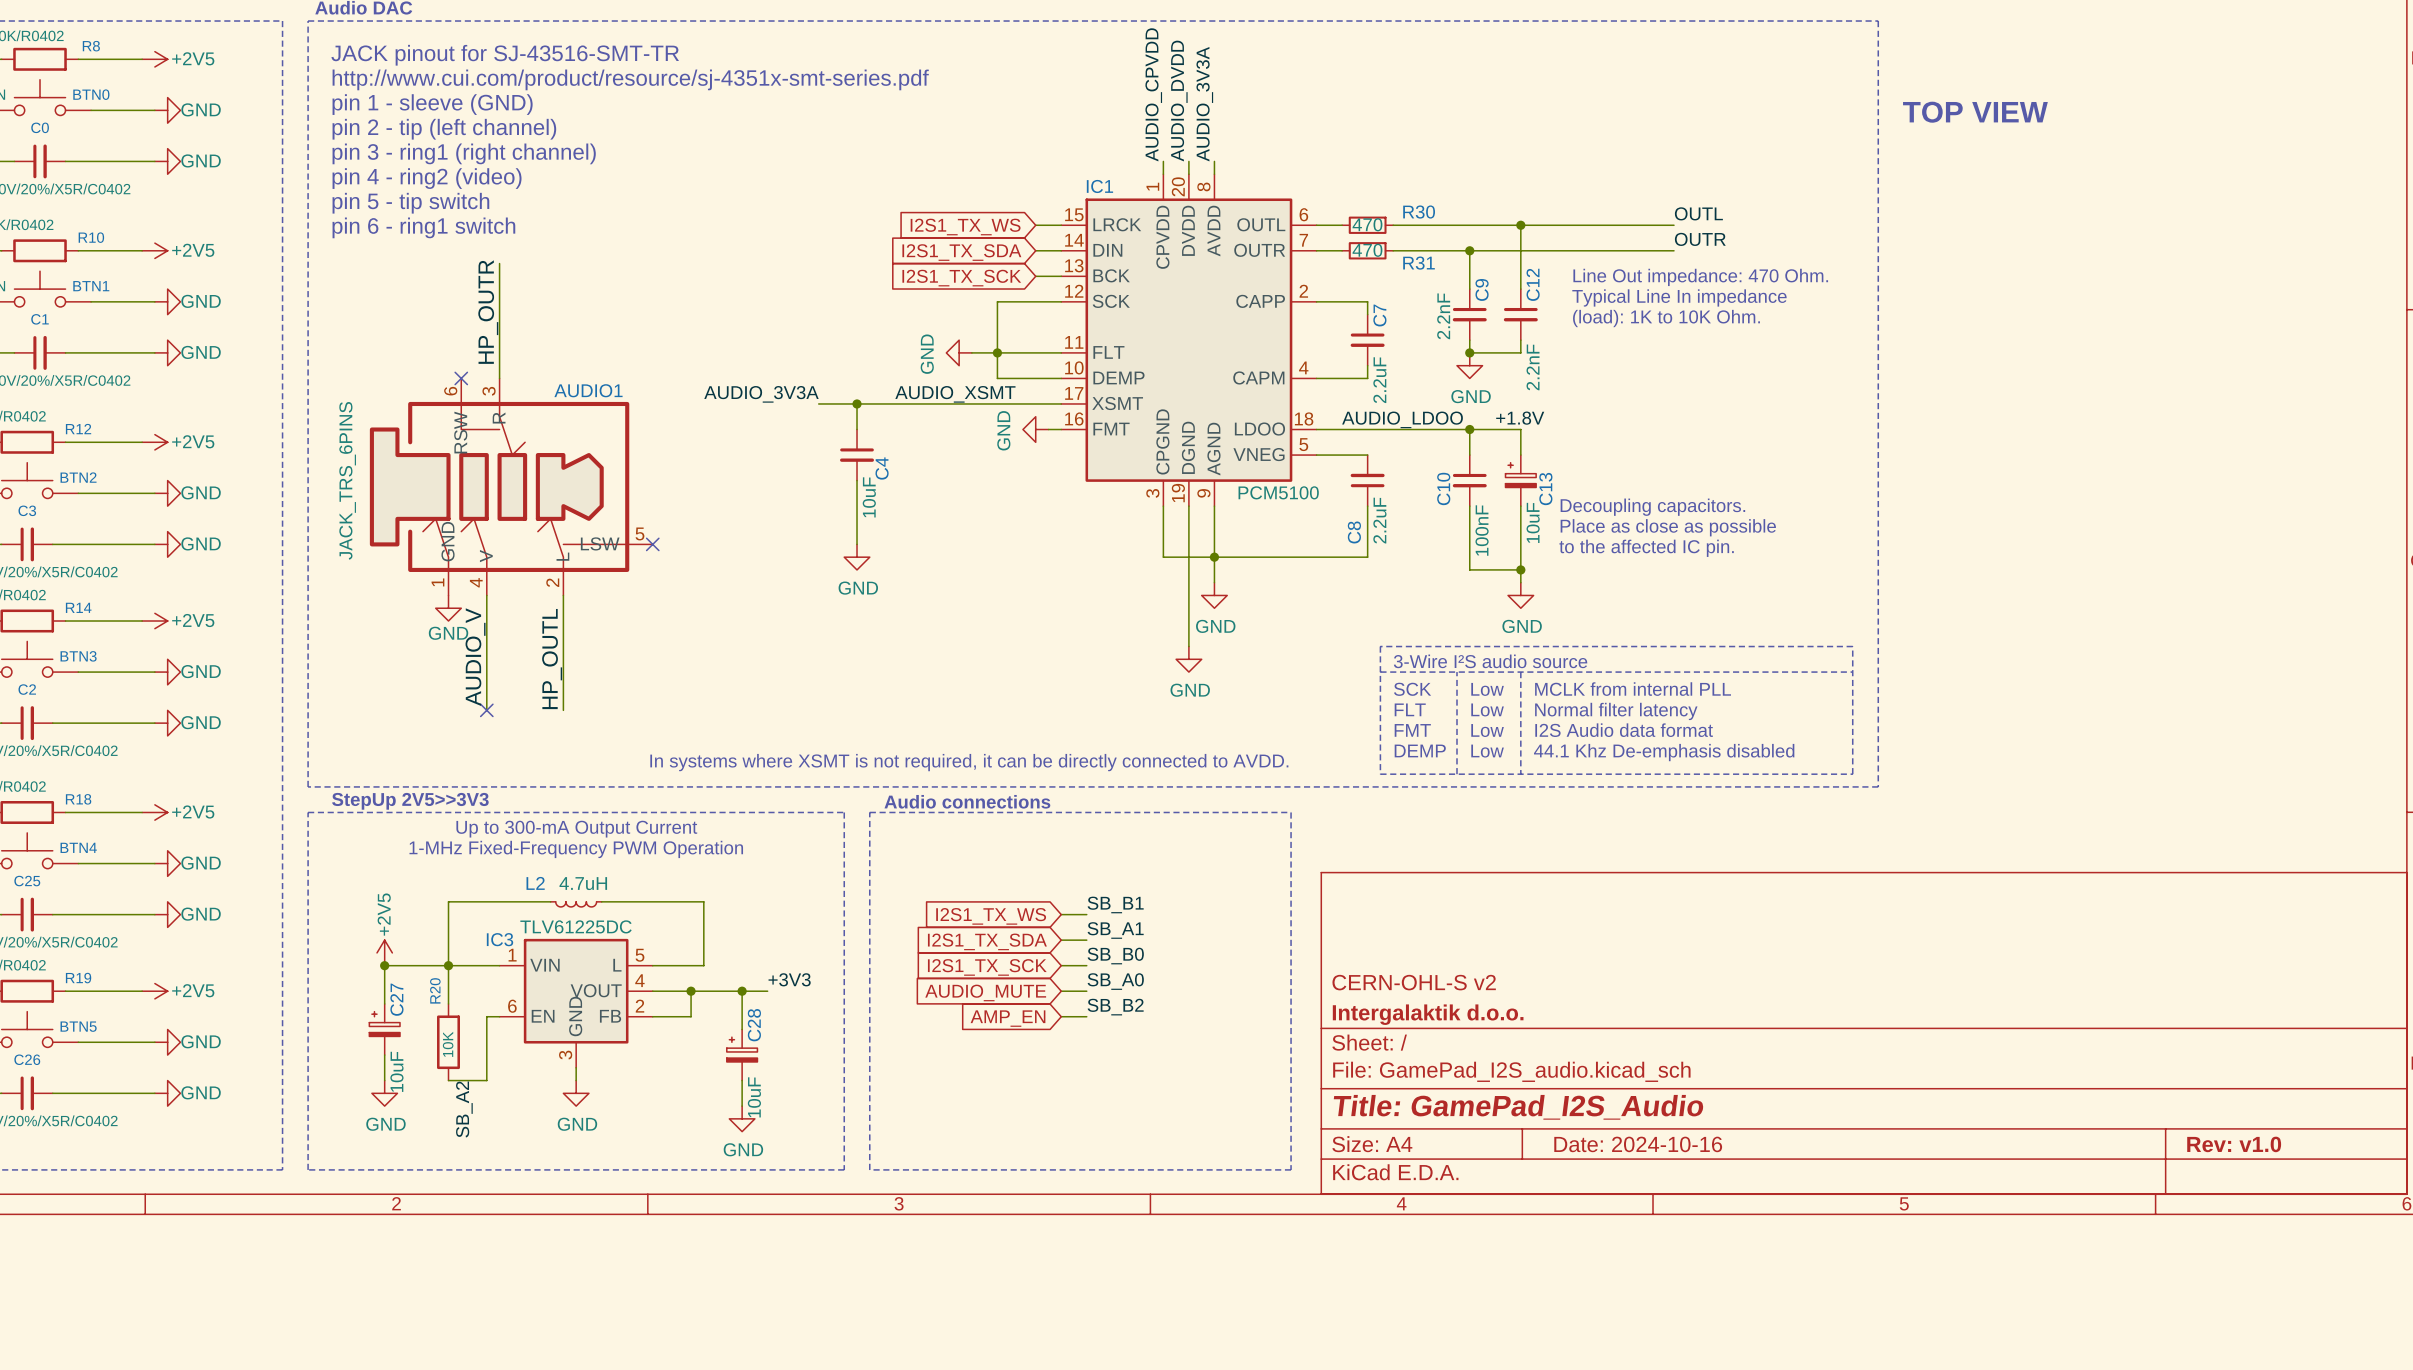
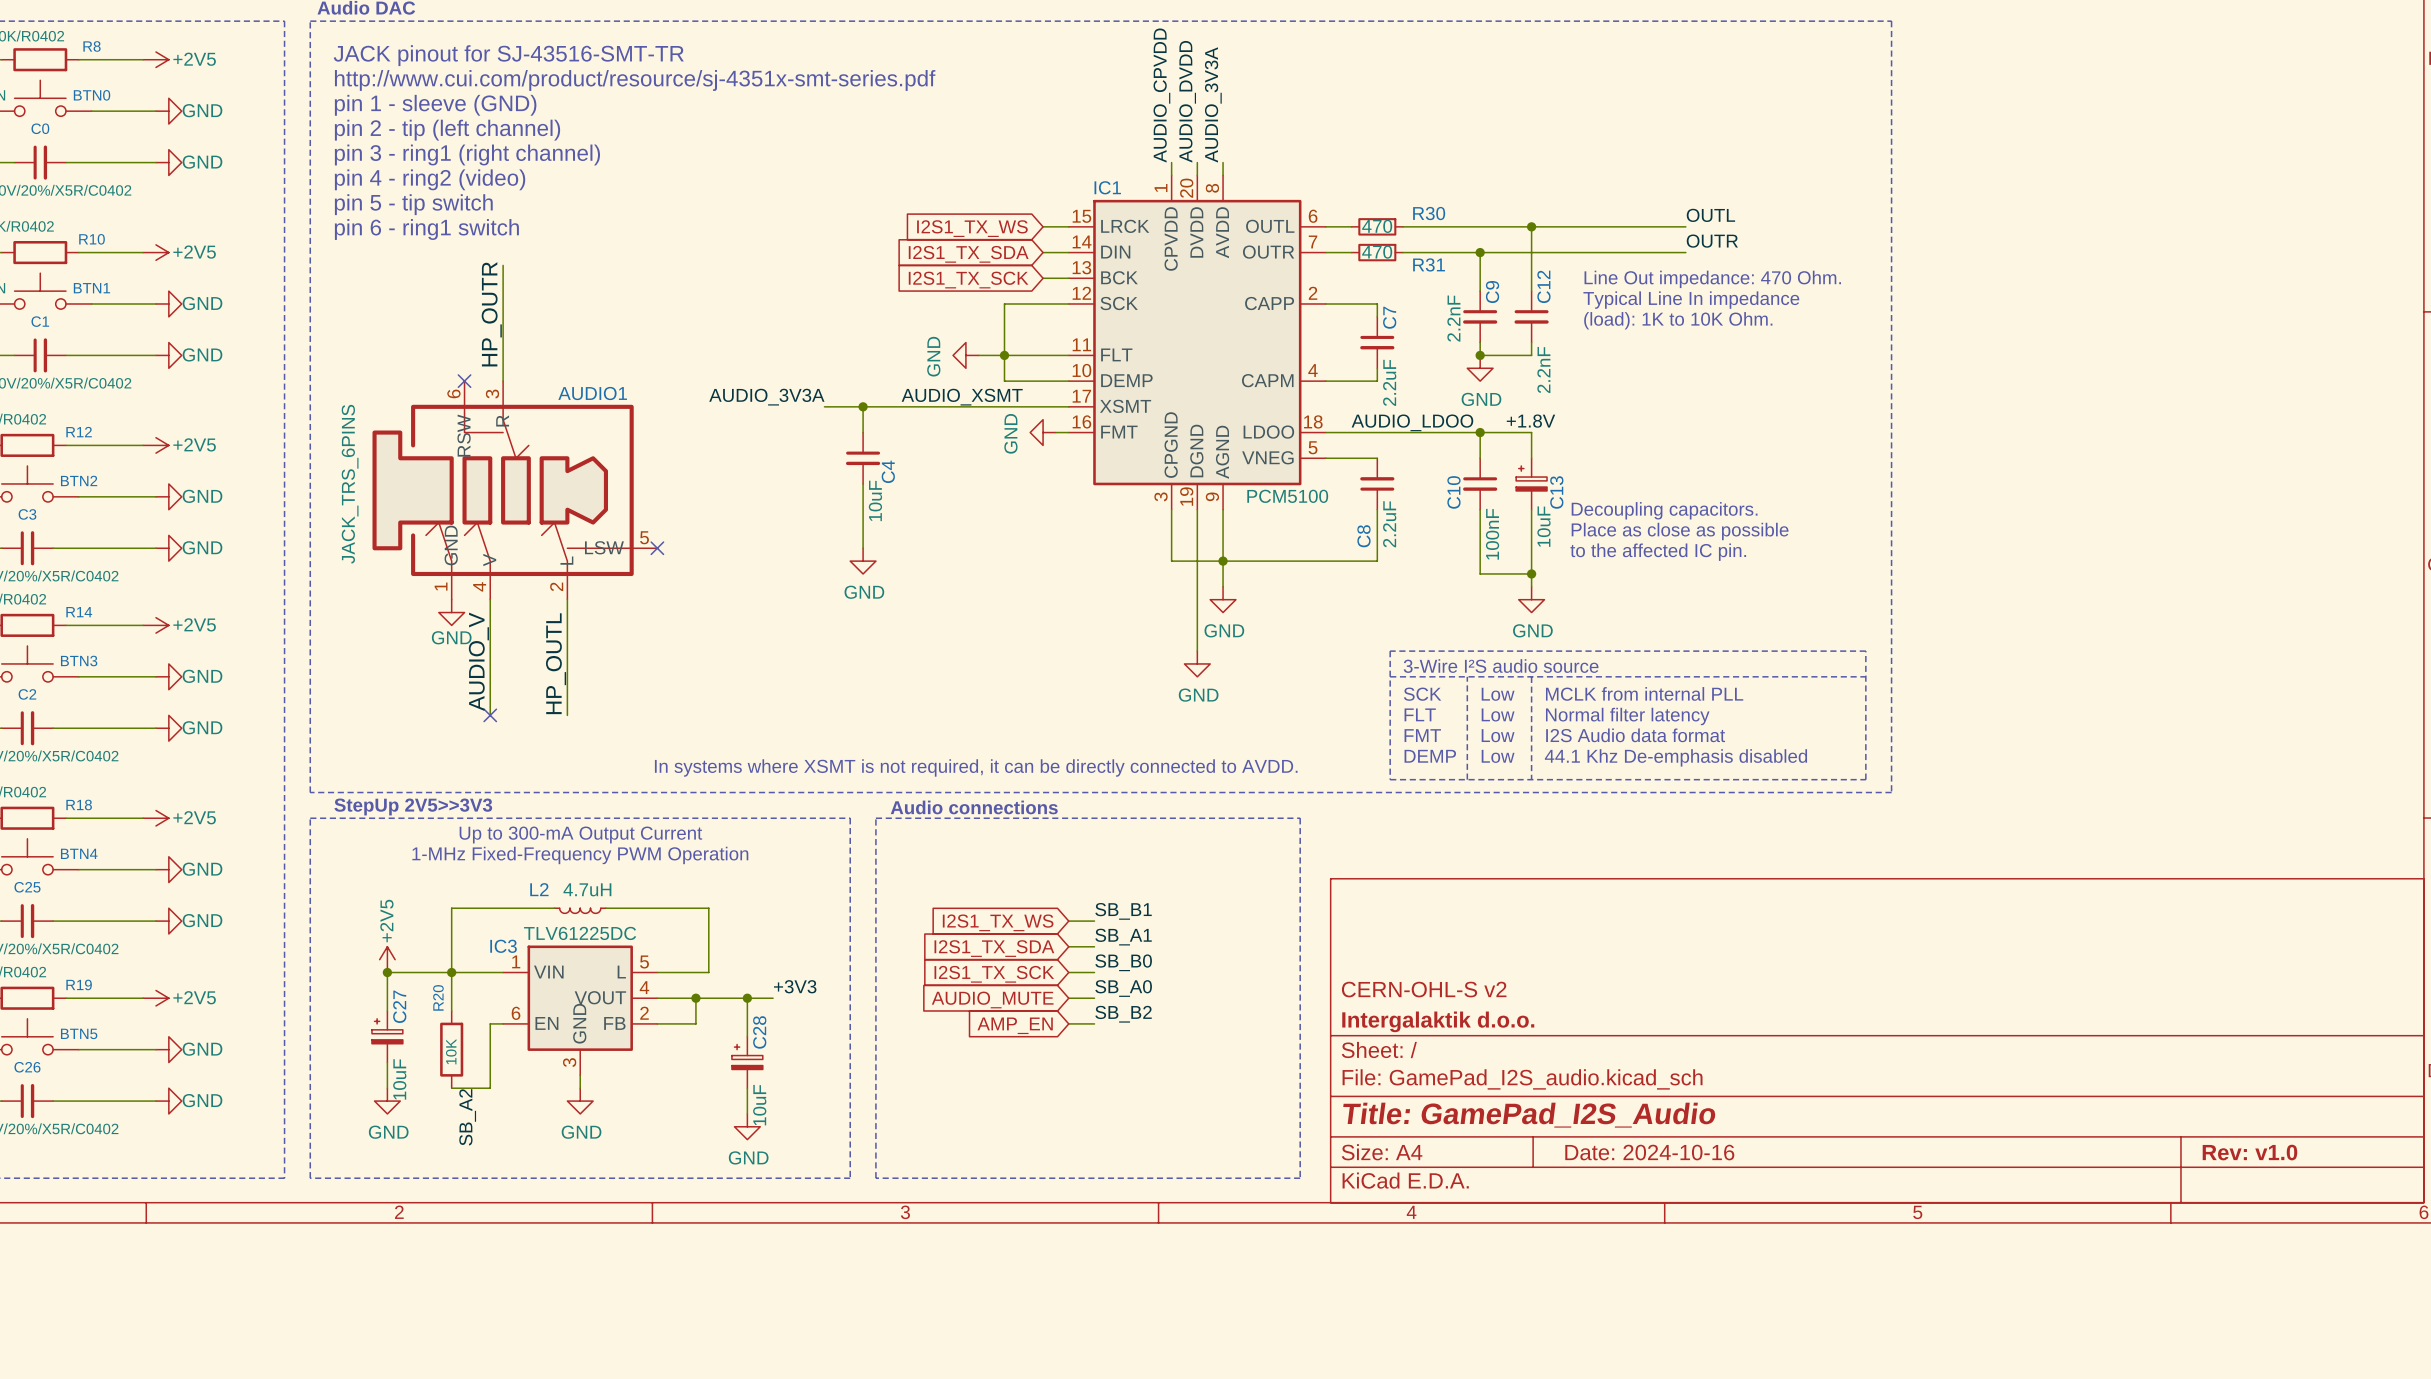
text: TOP VIEW (1975, 112) -> none

